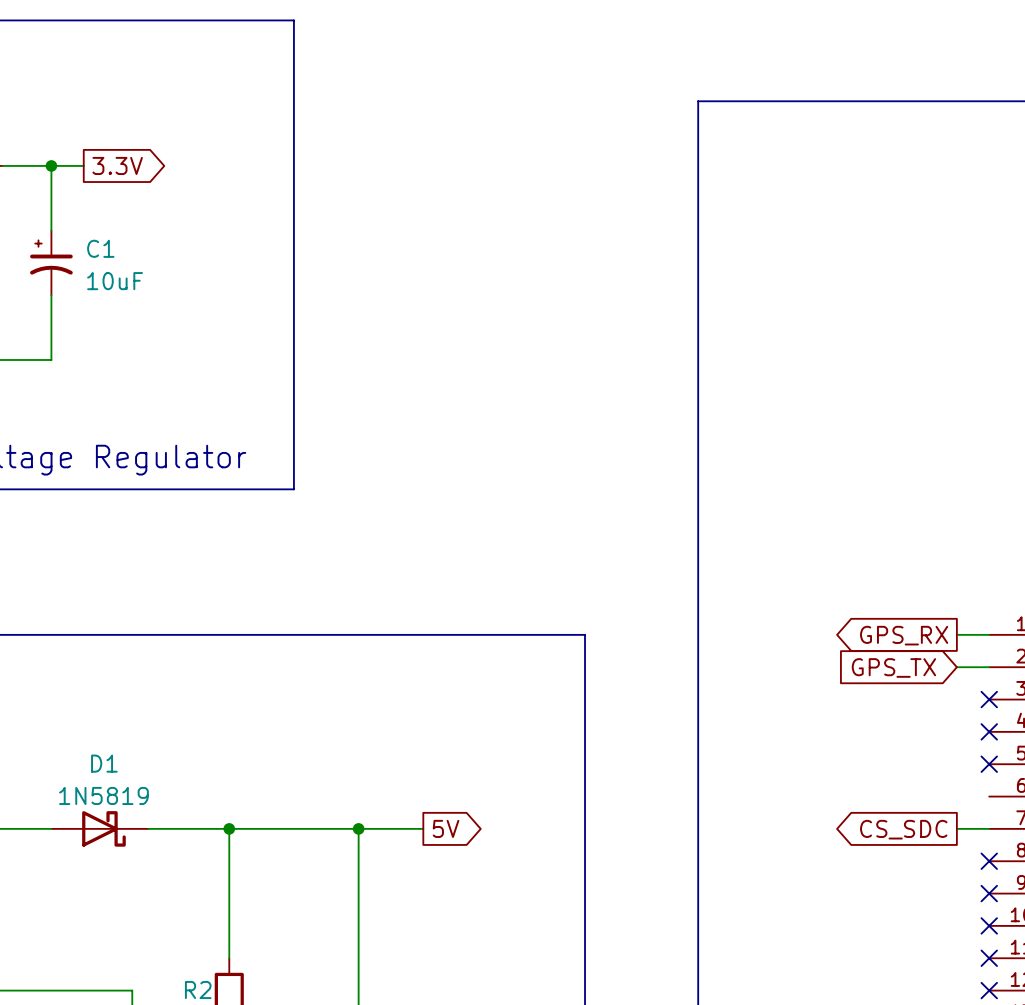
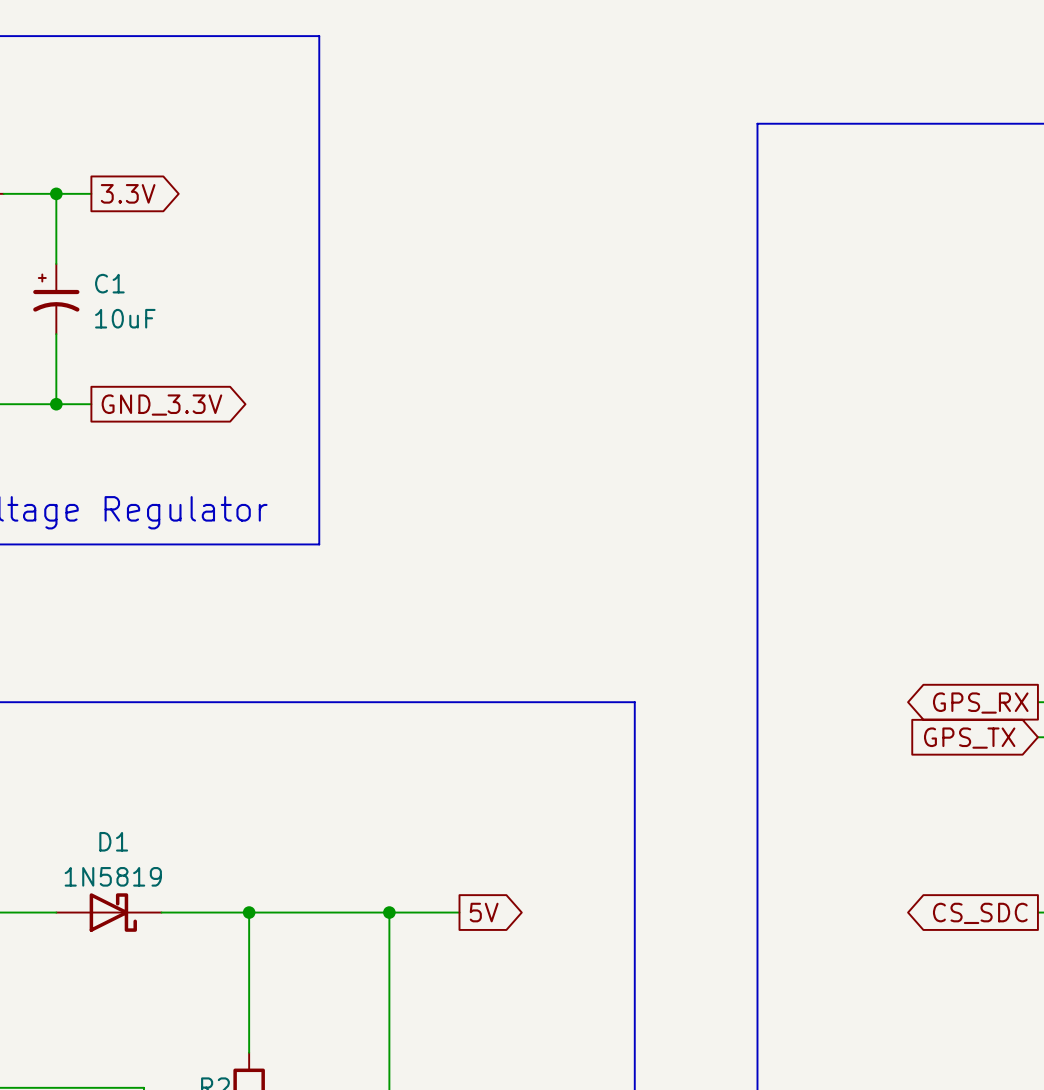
wire: none -> (56, 404) (91, 404)
junction: none -> (56, 404)
global label: none -> GND_3.3V (161, 405)

